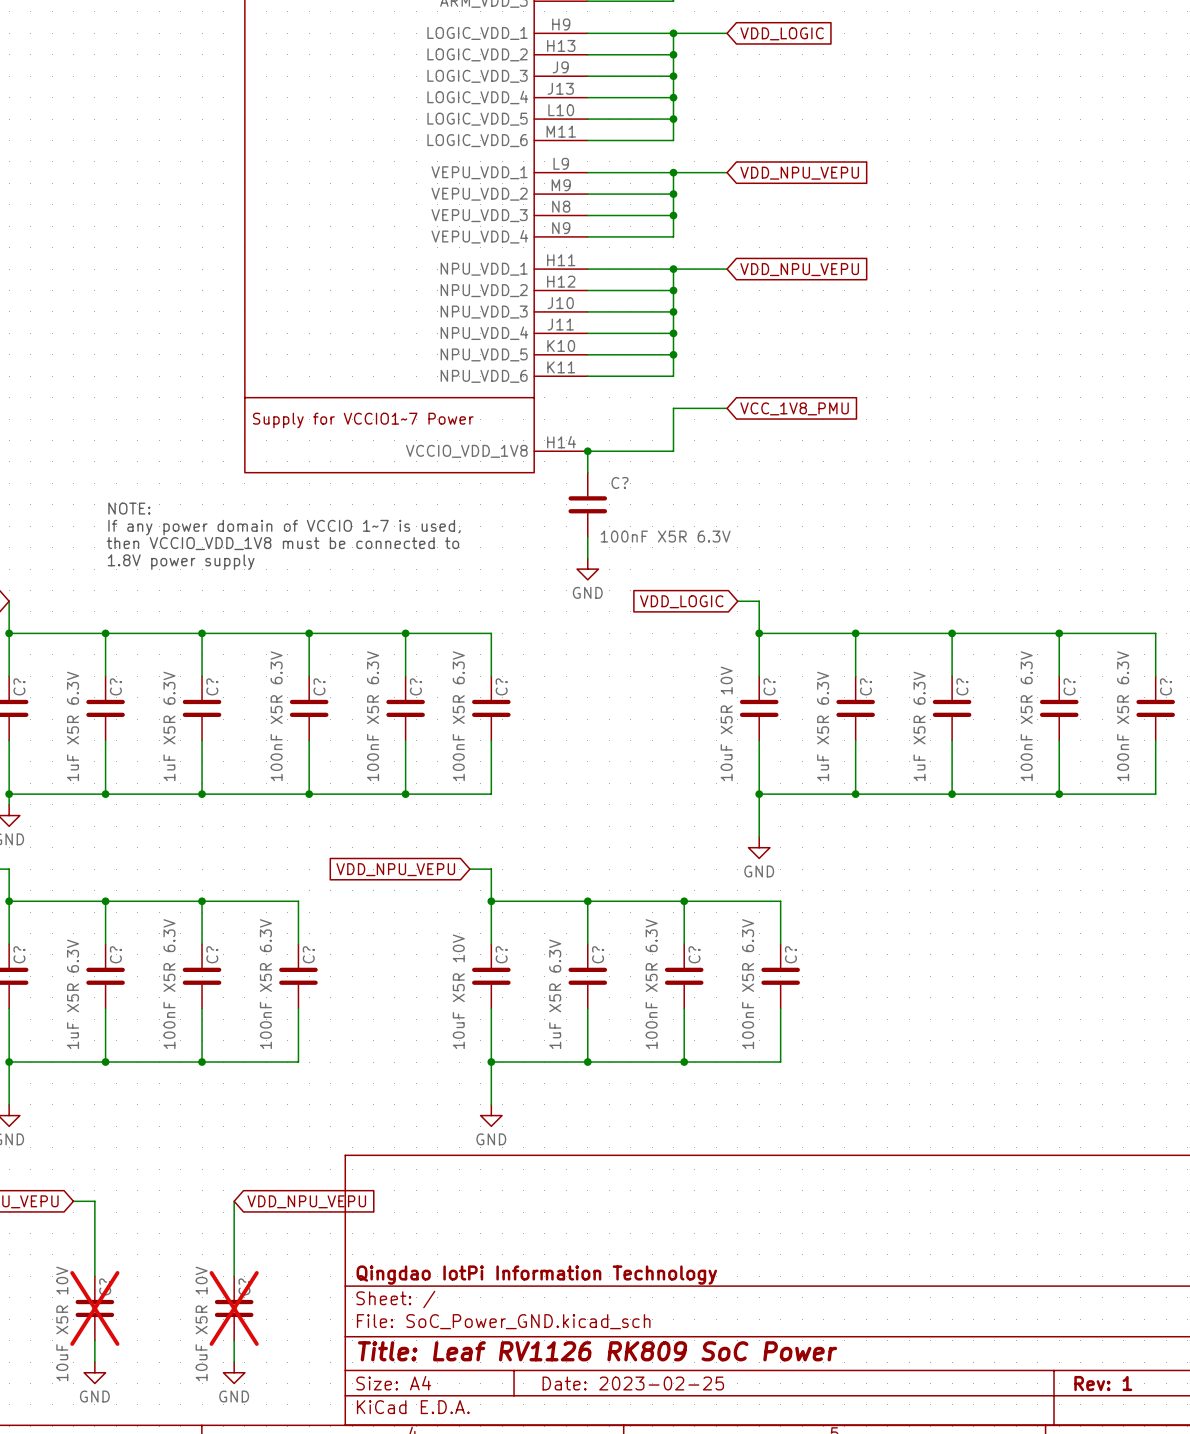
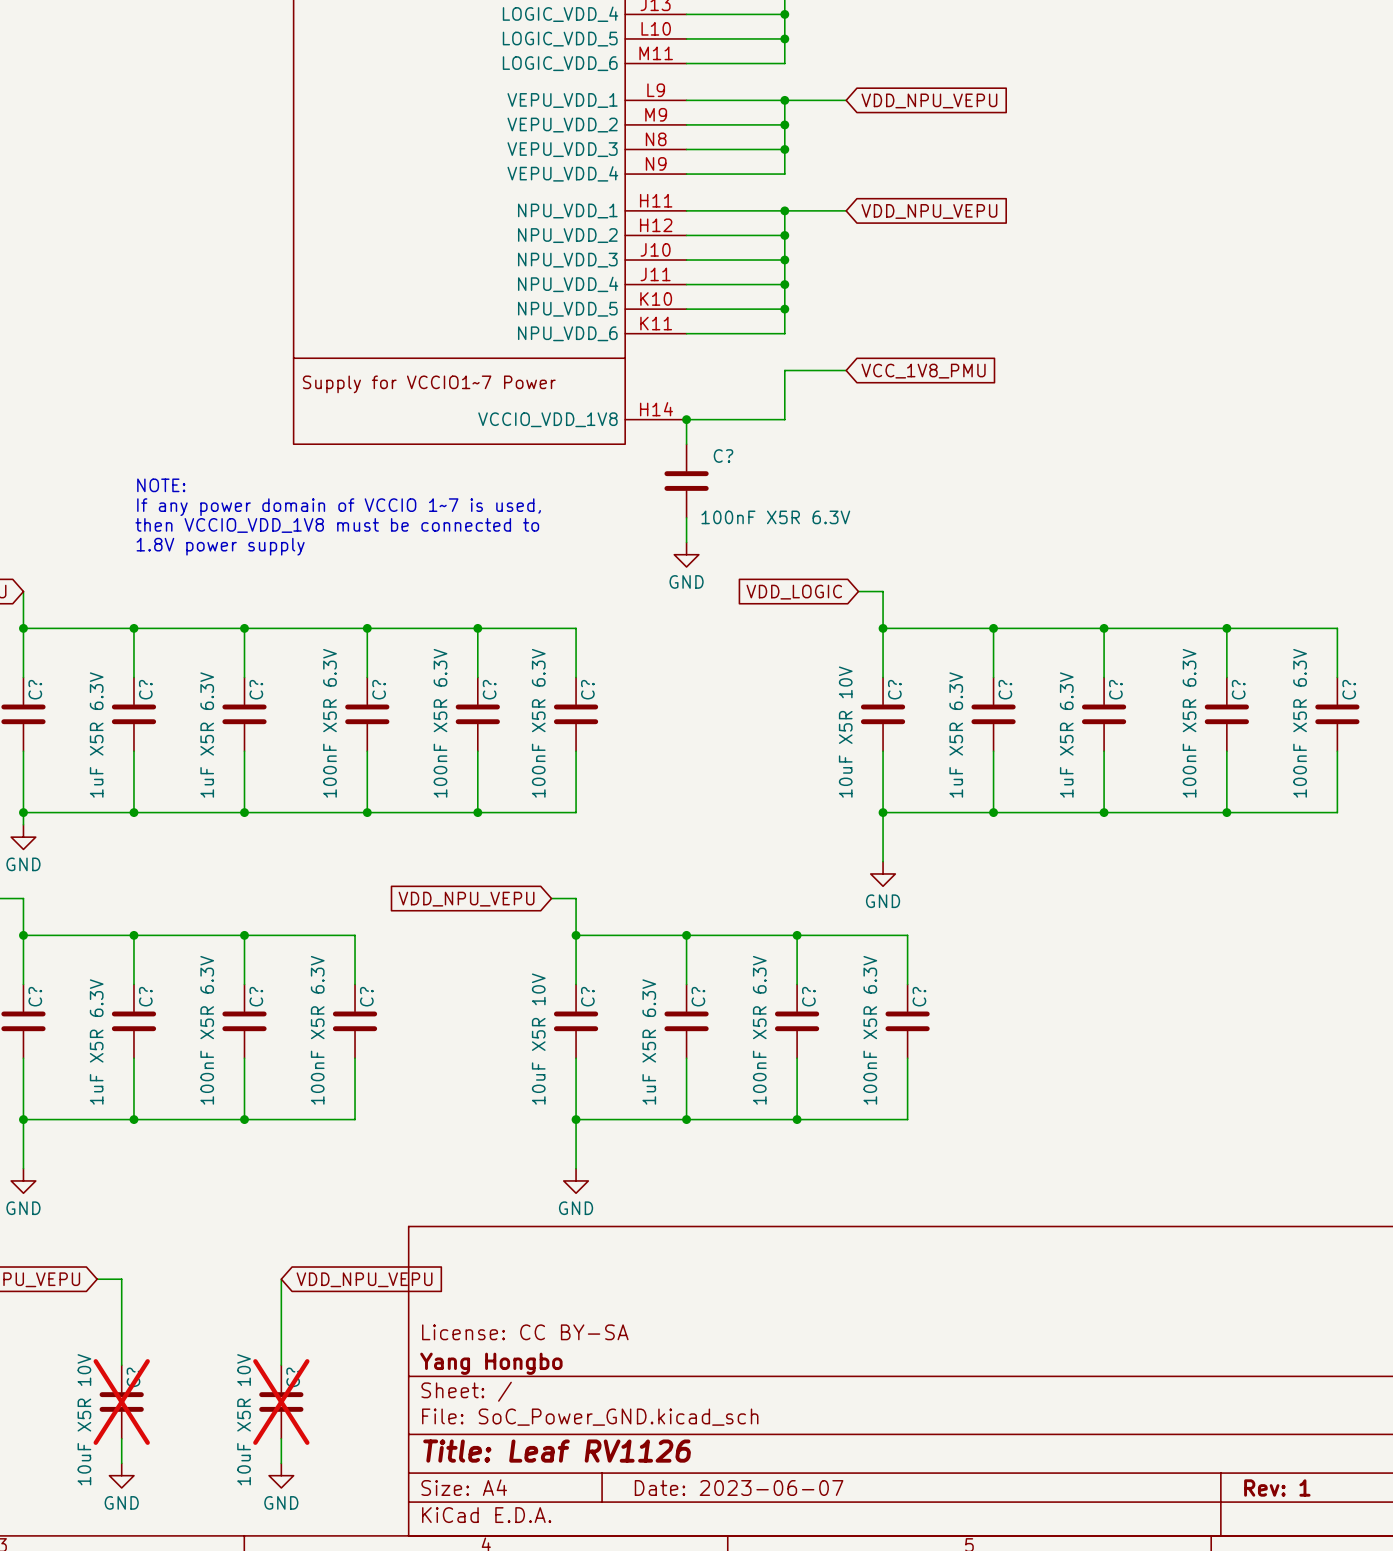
title block: none -> License: CC BY-SA (525, 1332)
title block: Qingdao IotPi Information Technology (536, 1275) -> Yang Hongbo (491, 1363)
title block: Title: Leaf RV1126 RK809 SoC Power (597, 1351) -> Title: Leaf RV1126 (557, 1451)
title block: Date: 2023-02-25 (633, 1383) -> Date: 2023-06-07 (739, 1487)

